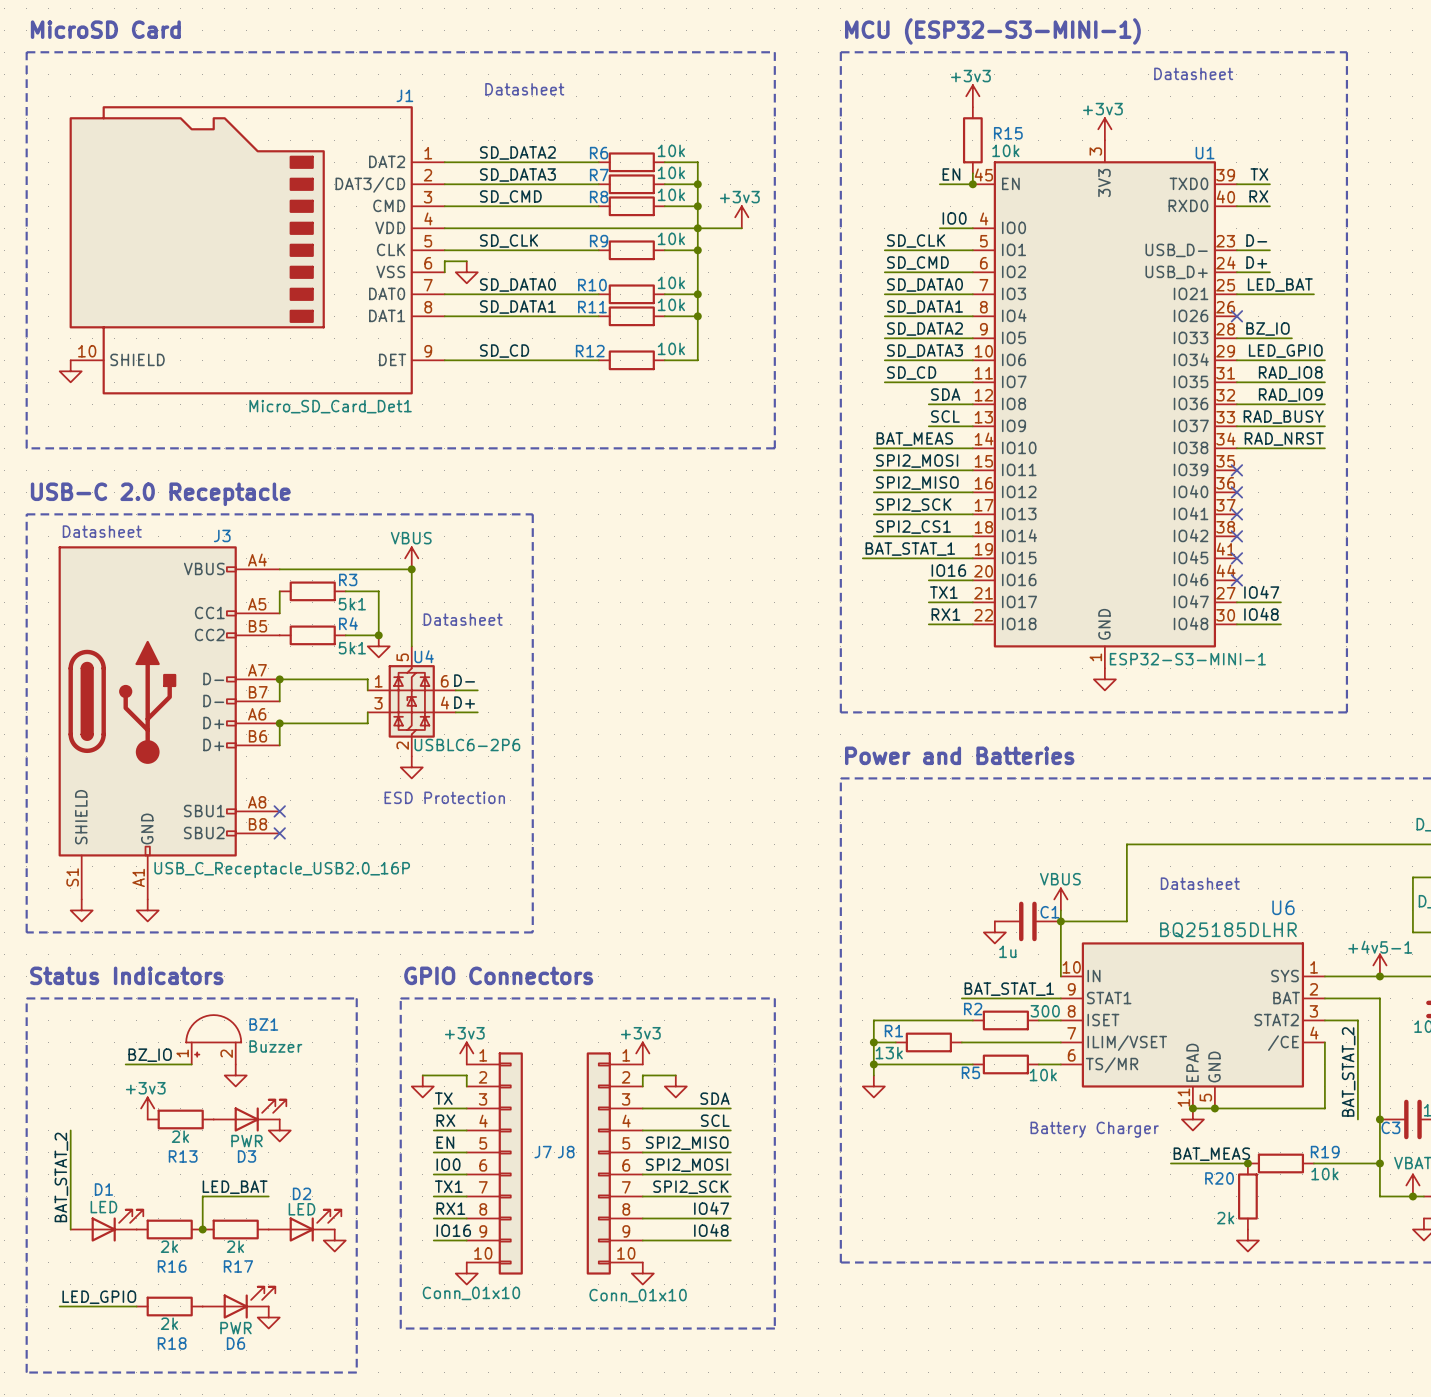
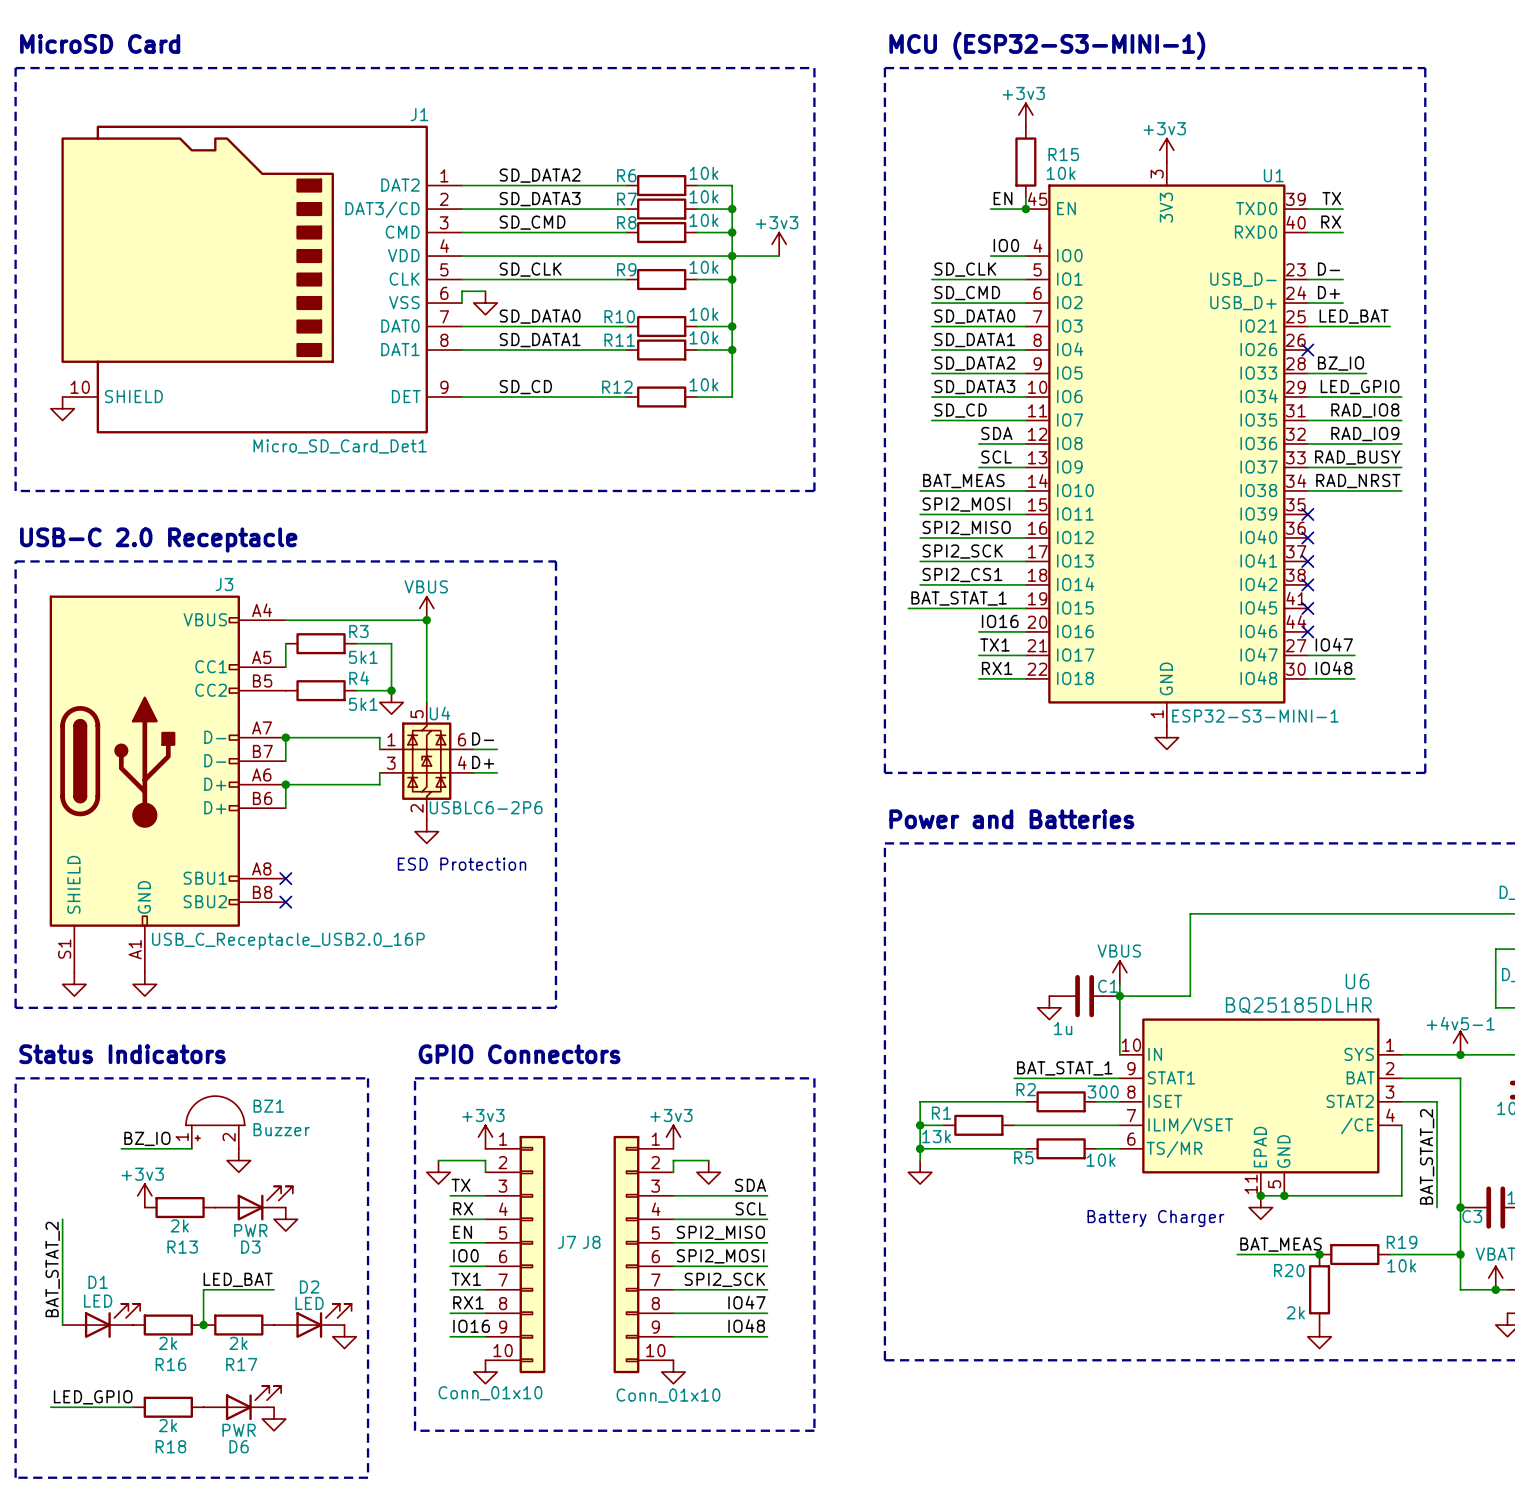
text: Datasheet (1193, 73) -> none
text: Datasheet (524, 89) -> none
text: Datasheet (102, 531) -> none
text: Datasheet (463, 619) -> none
text: Datasheet (1200, 883) -> none

